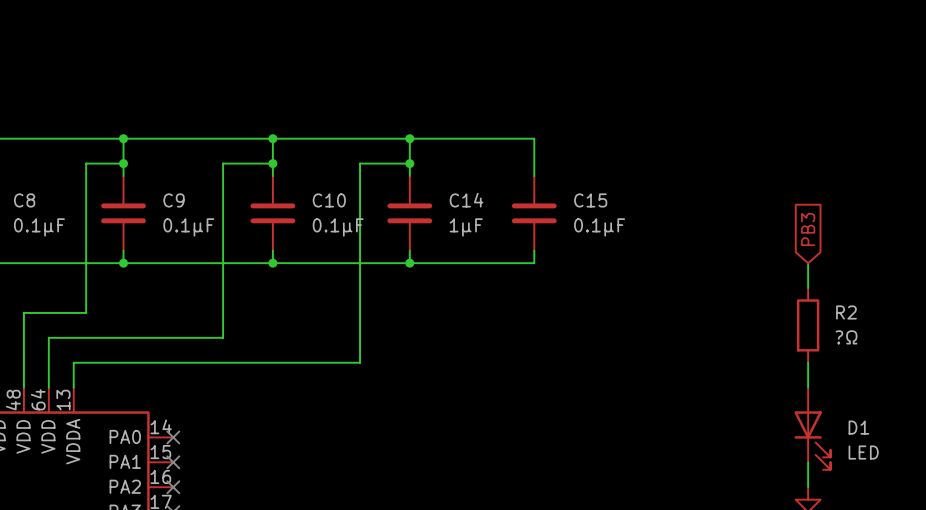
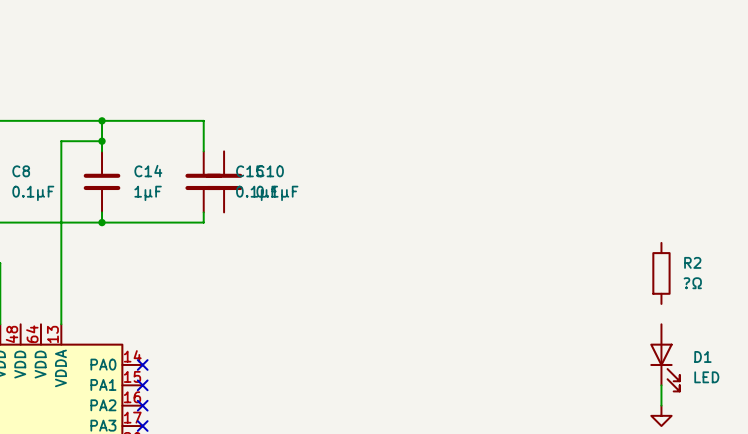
wire: (247, 138) (534, 138) (534, 176) -> (203, 120) (203, 151)
wire: (272, 138) (272, 176) -> none
junction: (272, 138) -> none
wire: (409, 138) (409, 176) -> none
junction: (409, 138) -> none
wire: (86, 163) (86, 312) (23, 312) (23, 387) -> (71, 141) (61, 141) (61, 303)
wire: (272, 163) (223, 163) (223, 337) (48, 337) (48, 387) -> none
junction: (272, 163) -> none
wire: (409, 163) (360, 163) (360, 362) (73, 362) -> none
junction: (409, 163) -> none
C9 name: C9 (173, 200) -> C14 (148, 171)
C14: 1μF (409, 213) -> none
C15 position: (534, 213) -> (203, 181)
C9 value: 0.1μF (188, 227) -> 1μF (148, 193)
global label: PB3 (808, 229) -> none
wire: (272, 250) (272, 263) -> none
wire: (409, 250) (409, 263) -> none
wire: (534, 250) (534, 263) (247, 263) -> (203, 212) (203, 222)
junction: (272, 263) -> none
junction: (409, 263) -> none
wire: (808, 263) (808, 288) -> none
wire: (808, 362) (808, 387) -> none

